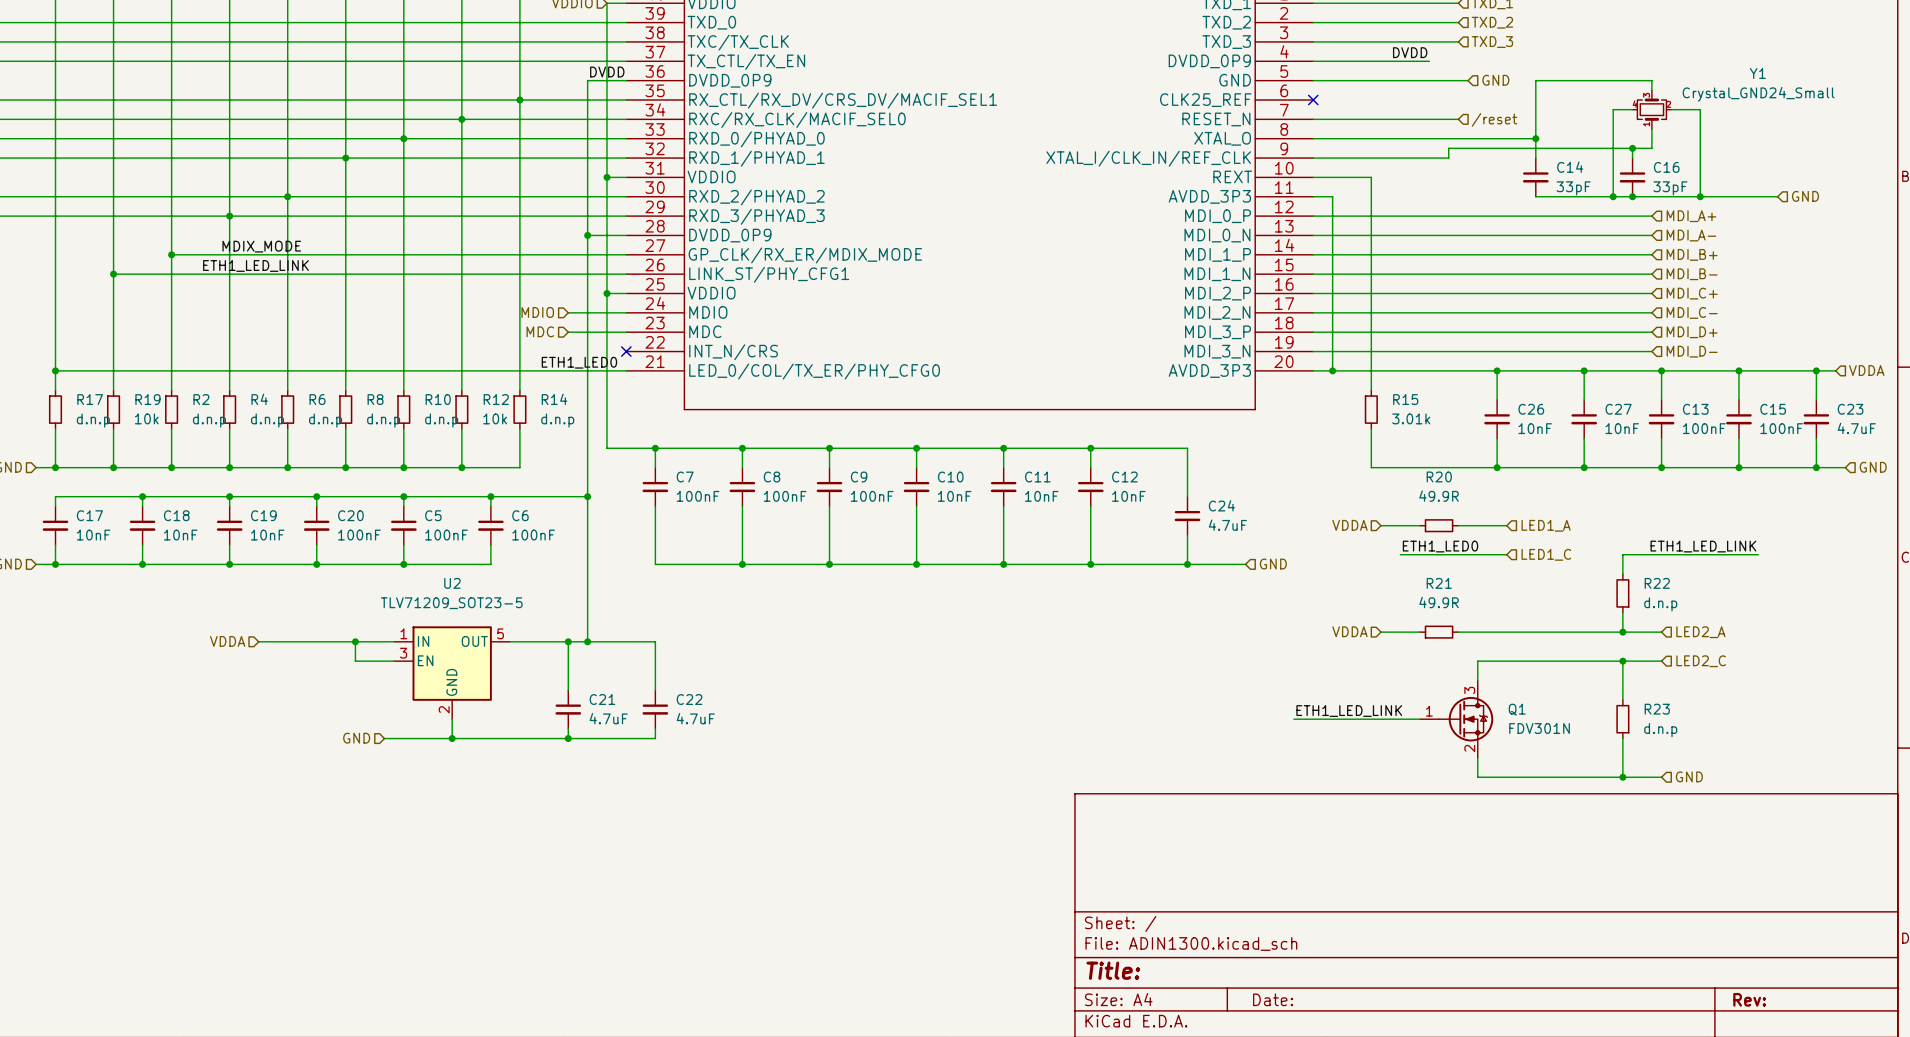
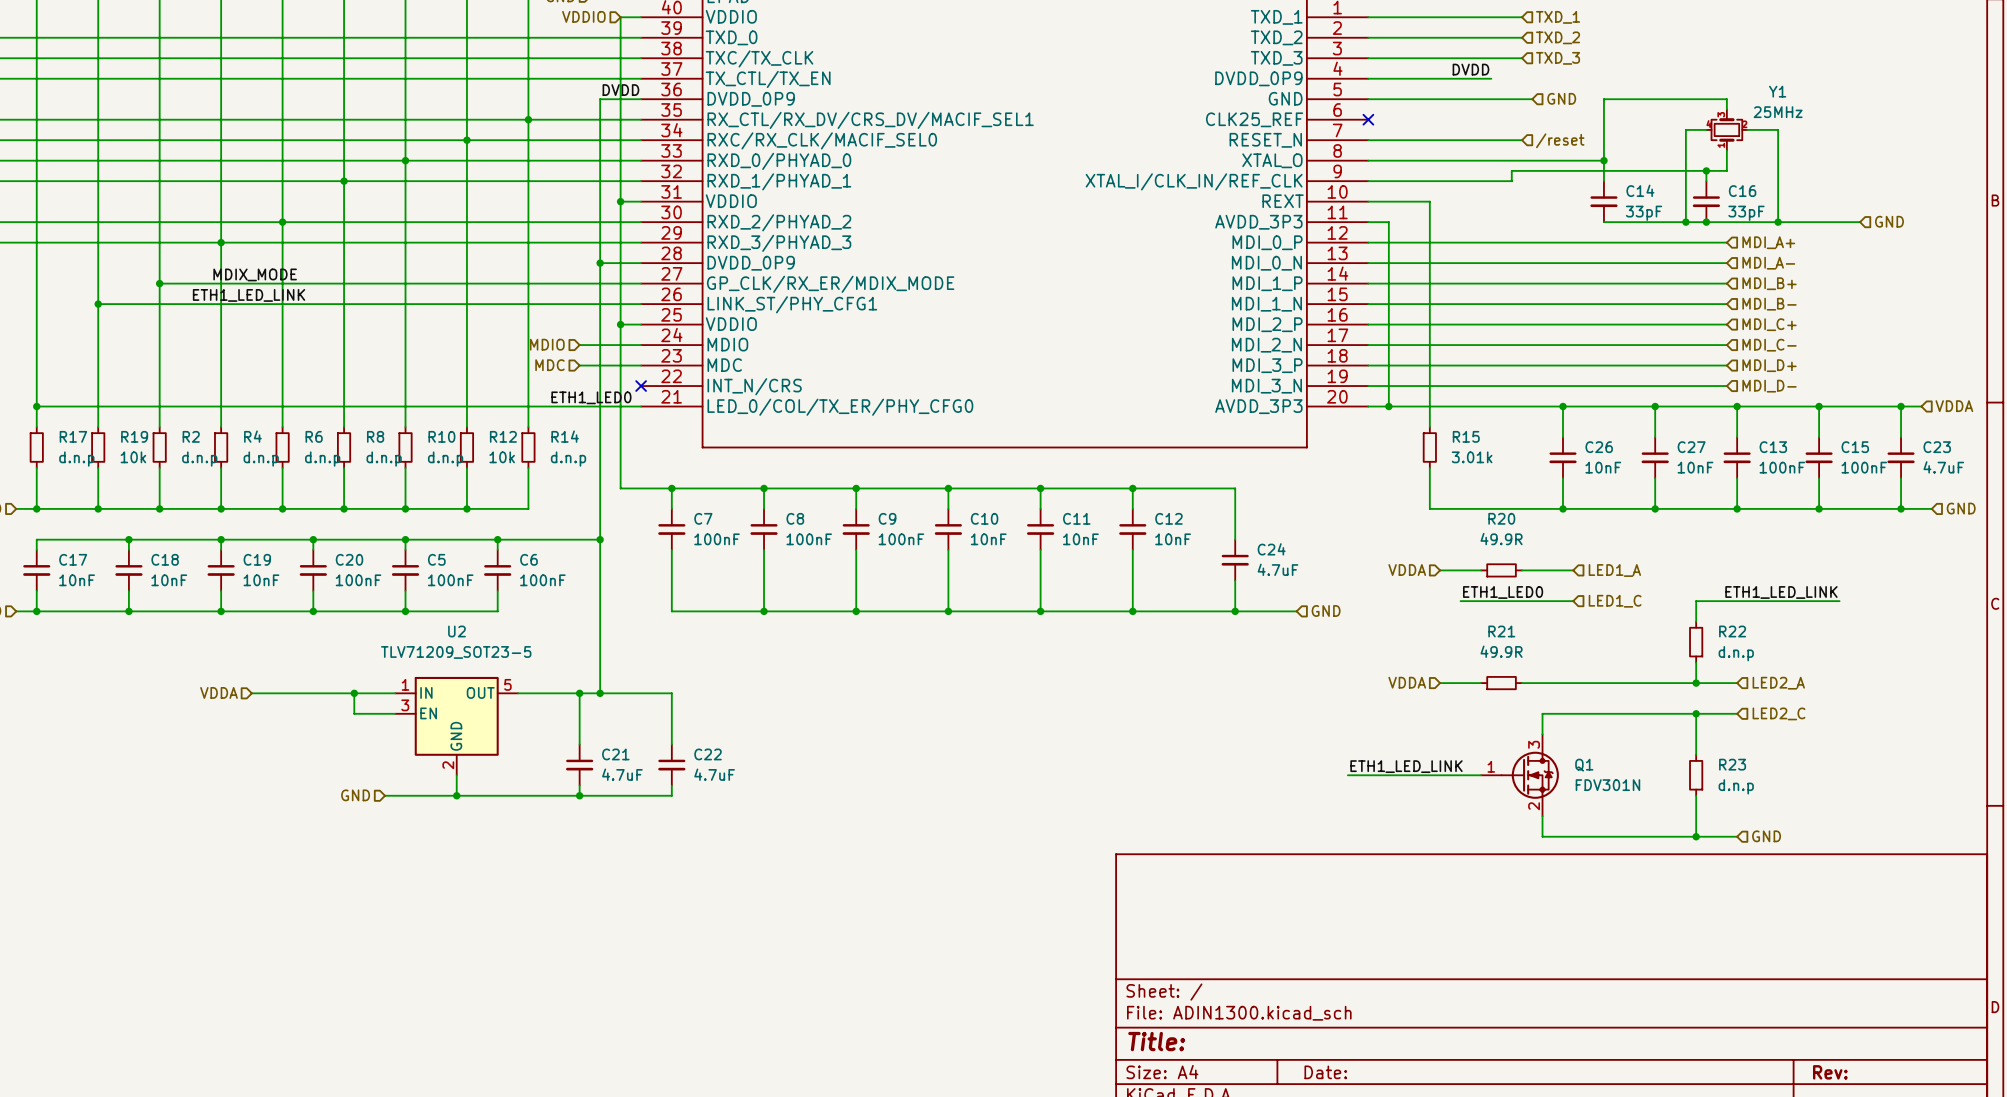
Y1 name position: Y1 (1757, 73) -> Y1 (1777, 91)
Y1 value: Crystal_GND24_Small (1758, 94) -> 25MHz (1778, 112)

